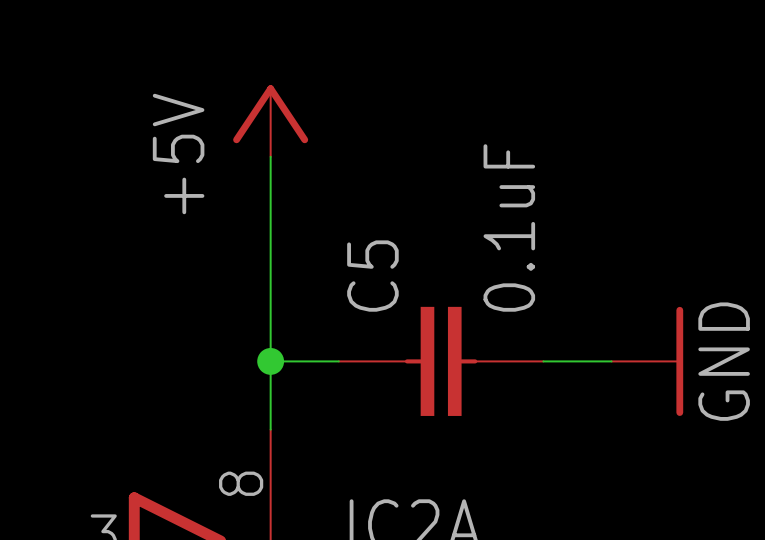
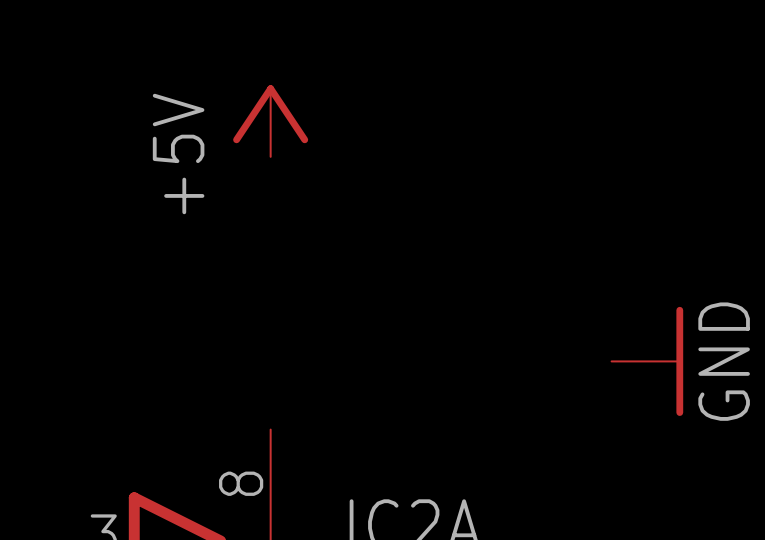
wire: (270, 156) (270, 429) -> none
wire: (270, 361) (338, 361) -> none
junction: (270, 361) -> none
C5: 0.1uF (441, 361) -> none
wire: (543, 361) (611, 361) -> none

